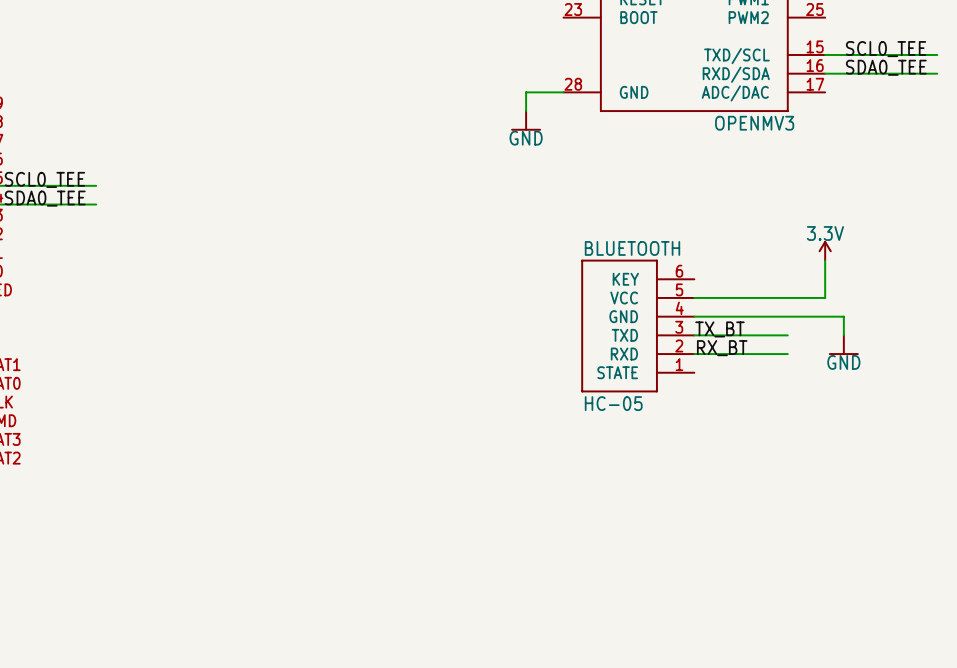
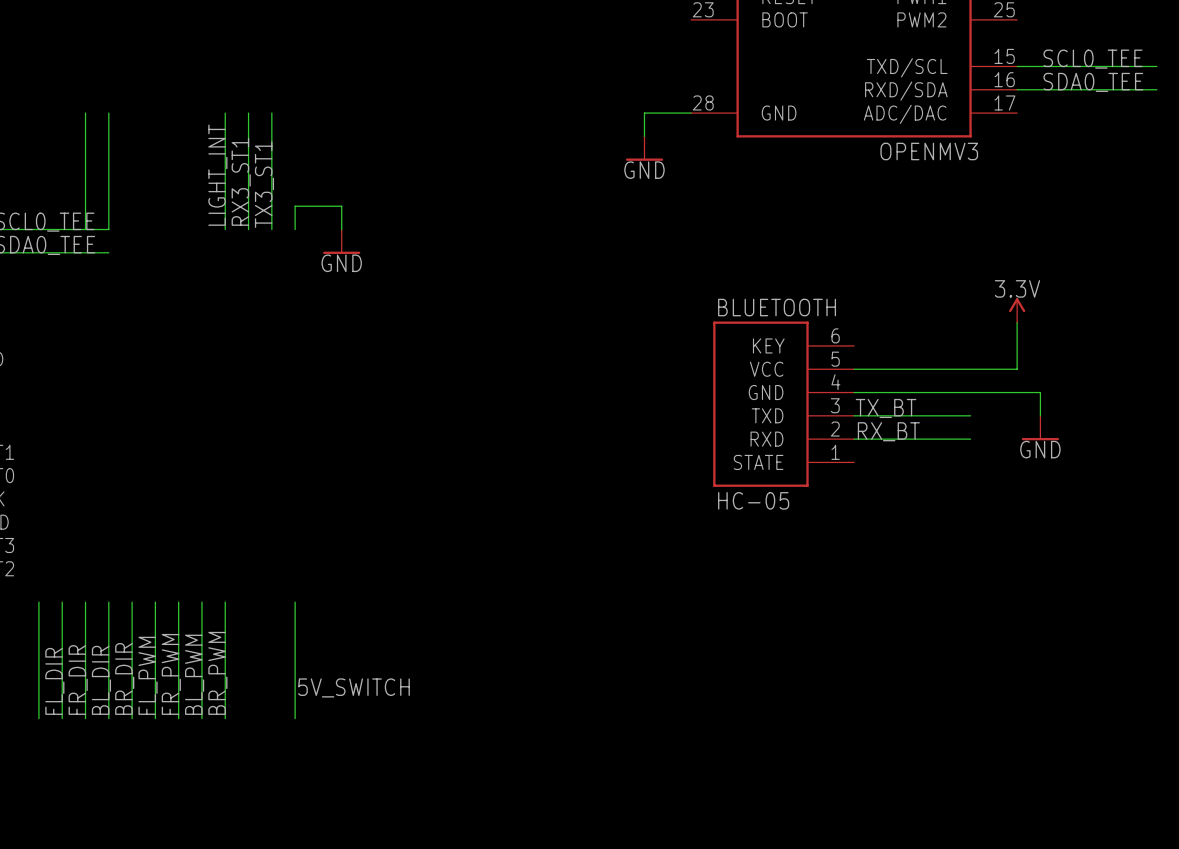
wire: none -> (85, 113) (85, 229)
wire: none -> (108, 113) (108, 229)
wire: none -> (225, 113) (225, 229)
wire: none -> (248, 113) (248, 229)
wire: none -> (271, 113) (271, 229)
label: none -> LIGHT_INT (217, 175)
label: none -> RX3_ST1 (241, 181)
label: none -> TX3_ST1 (264, 184)
wire: none -> (295, 229) (295, 206) (341, 206) (341, 229)
power symbol: none -> GND (341, 241)
wire: none -> (38, 602) (38, 718)
wire: none -> (62, 602) (62, 718)
wire: none -> (85, 602) (85, 718)
wire: none -> (108, 602) (108, 718)
wire: none -> (132, 602) (132, 718)
wire: none -> (155, 602) (155, 718)
wire: none -> (178, 602) (178, 718)
wire: none -> (201, 602) (201, 718)
wire: none -> (225, 602) (225, 718)
wire: none -> (295, 602) (295, 718)
label: none -> FR_PWM (171, 674)
label: none -> BR_PWM (217, 673)
label: none -> BL_PWM (194, 674)
label: none -> FL_PWM (148, 675)
label: none -> BR_DIR (124, 678)
label: none -> FR_DIR (78, 680)
label: none -> BL_DIR (101, 680)
label: none -> FL_DIR (54, 681)
label: none -> 5V_SWITCH (353, 687)

